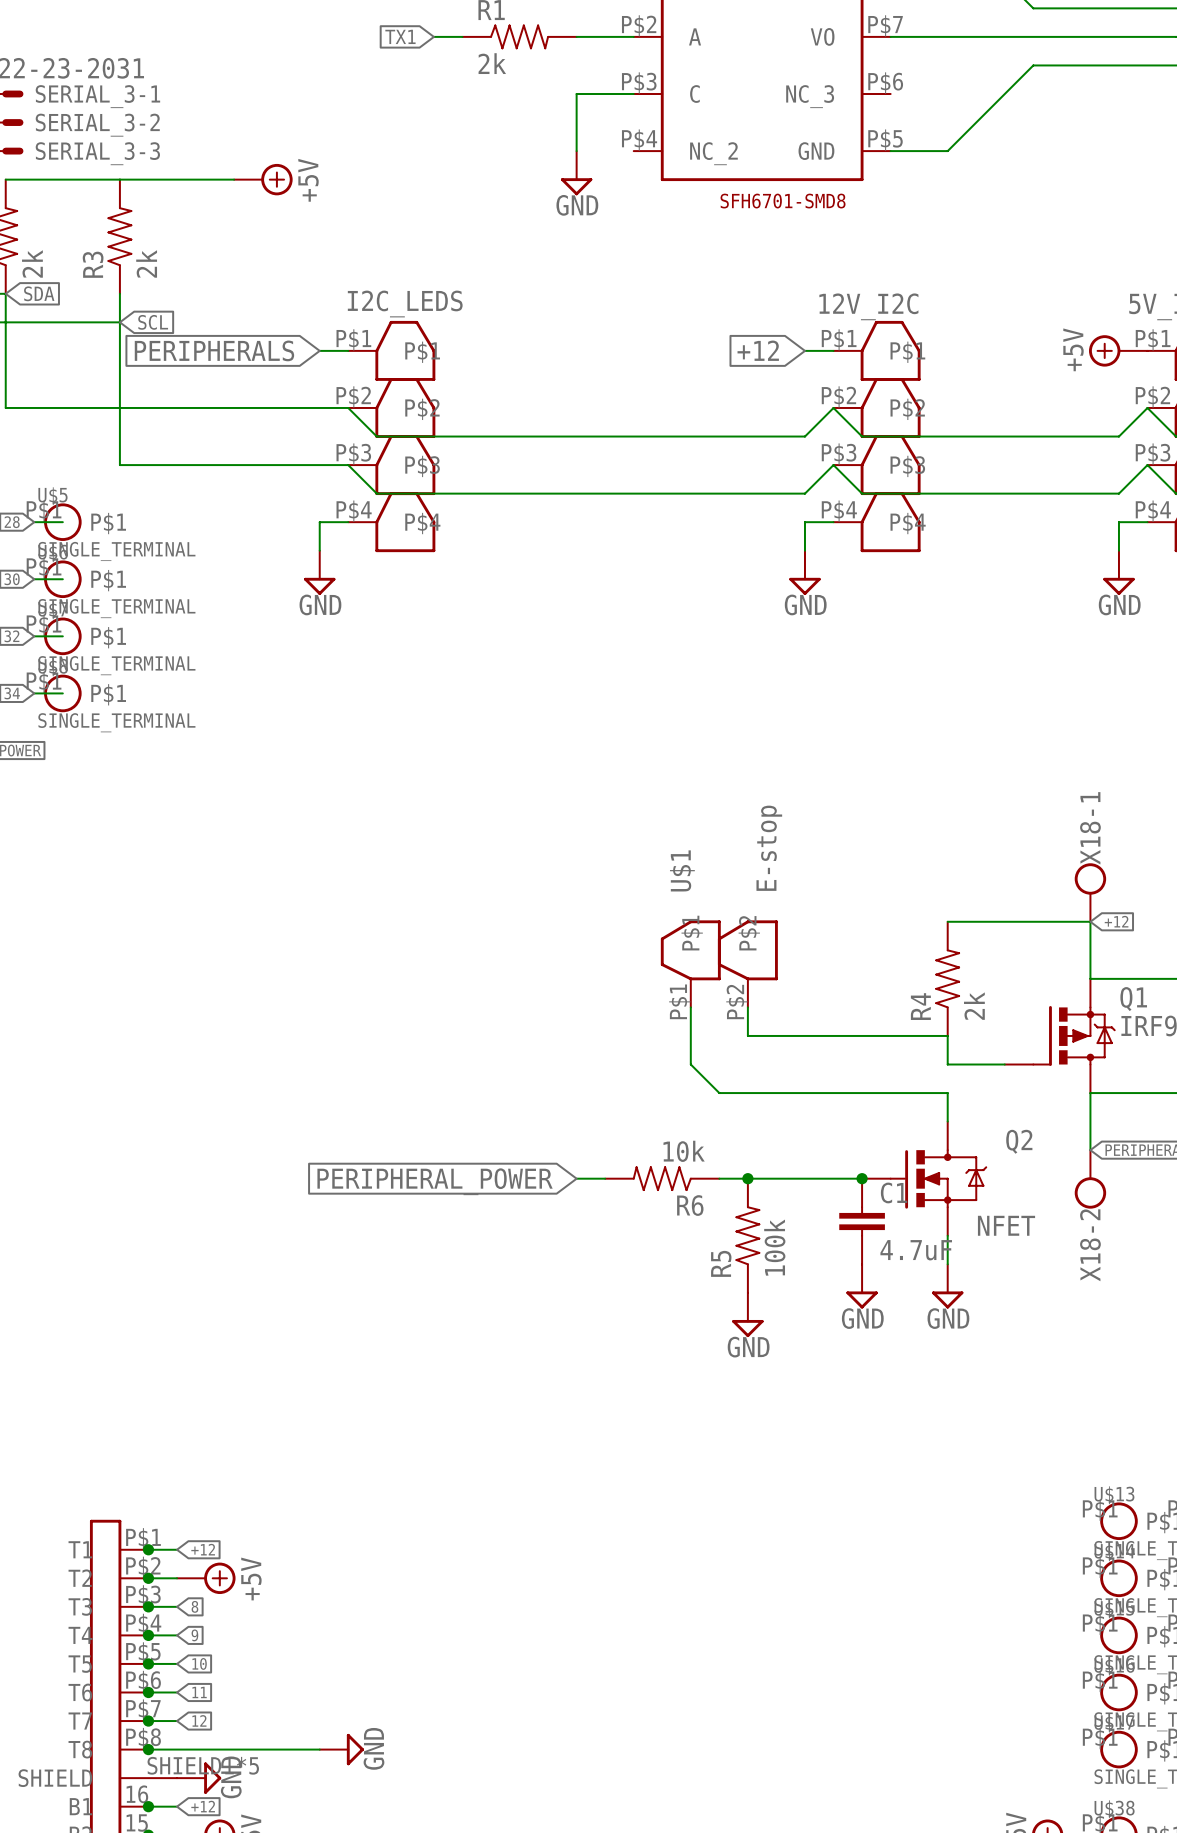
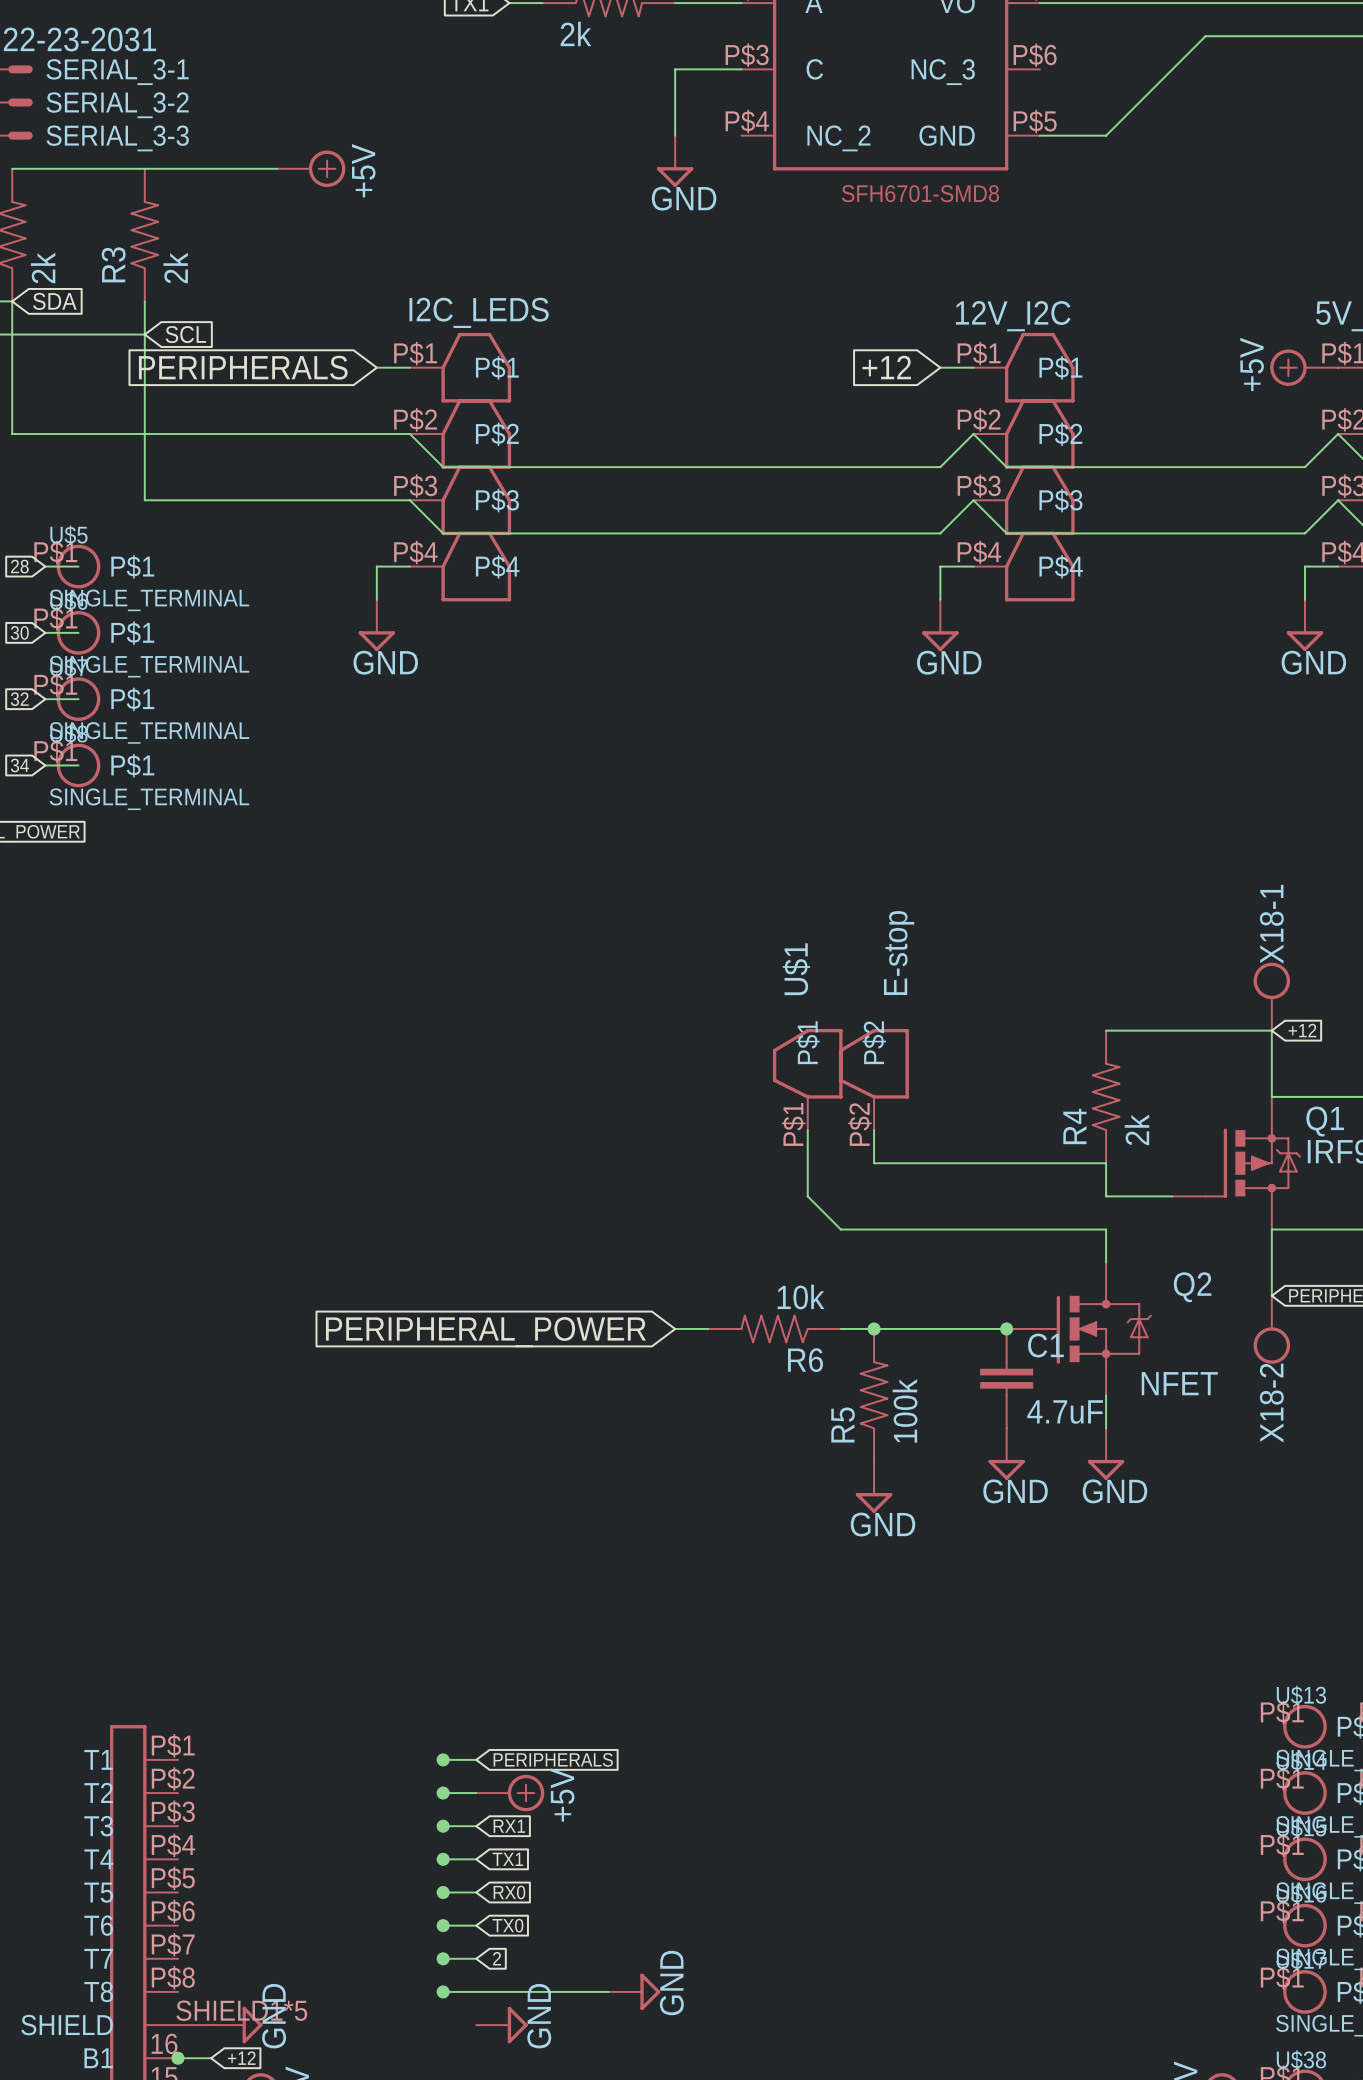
wire: (148, 1549) (177, 1549) -> (443, 1759) (476, 1759)
junction: (148, 1549) -> none
global label: +12 (203, 1549) -> none
junction: none -> (443, 1759)
global label: none -> PERIPHERALS (553, 1759)
wire: (148, 1578) (177, 1578) -> (443, 1793) (476, 1793)
junction: (148, 1578) -> none
power symbol: +5V (206, 1578) -> none
junction: none -> (443, 1793)
power symbol: none -> +5V (510, 1793)
wire: (148, 1606) (177, 1606) -> (443, 1826) (476, 1826)
junction: (148, 1606) -> none
global label: 8 (194, 1606) -> none
junction: none -> (443, 1826)
global label: none -> RX1 (509, 1826)
wire: (148, 1635) (177, 1635) -> (443, 1859) (476, 1859)
junction: (148, 1635) -> none
global label: 9 (194, 1635) -> none
junction: none -> (443, 1859)
global label: none -> TX1 (507, 1859)
wire: (148, 1663) (177, 1663) -> (443, 1892) (476, 1892)
junction: (148, 1663) -> none
global label: 10 (199, 1663) -> none
junction: none -> (443, 1892)
global label: none -> RX0 (509, 1892)
wire: (148, 1692) (177, 1692) -> (443, 1925) (476, 1925)
junction: (148, 1692) -> none
global label: 11 (199, 1692) -> none
junction: none -> (443, 1925)
global label: none -> TX0 (507, 1925)
global label: 12 (199, 1720) -> none
global label: none -> 2 (497, 1958)
wire: (148, 1721) (177, 1721) -> (443, 1958) (476, 1958)
junction: (148, 1721) -> none
junction: none -> (443, 1958)
wire: (148, 1749) (319, 1749) -> none
junction: (148, 1749) -> none
power symbol position: GND (341, 1749) -> GND (501, 2025)
wire: none -> (443, 1991) (608, 1991)
junction: none -> (443, 1991)
power symbol: none -> GND (634, 1991)

